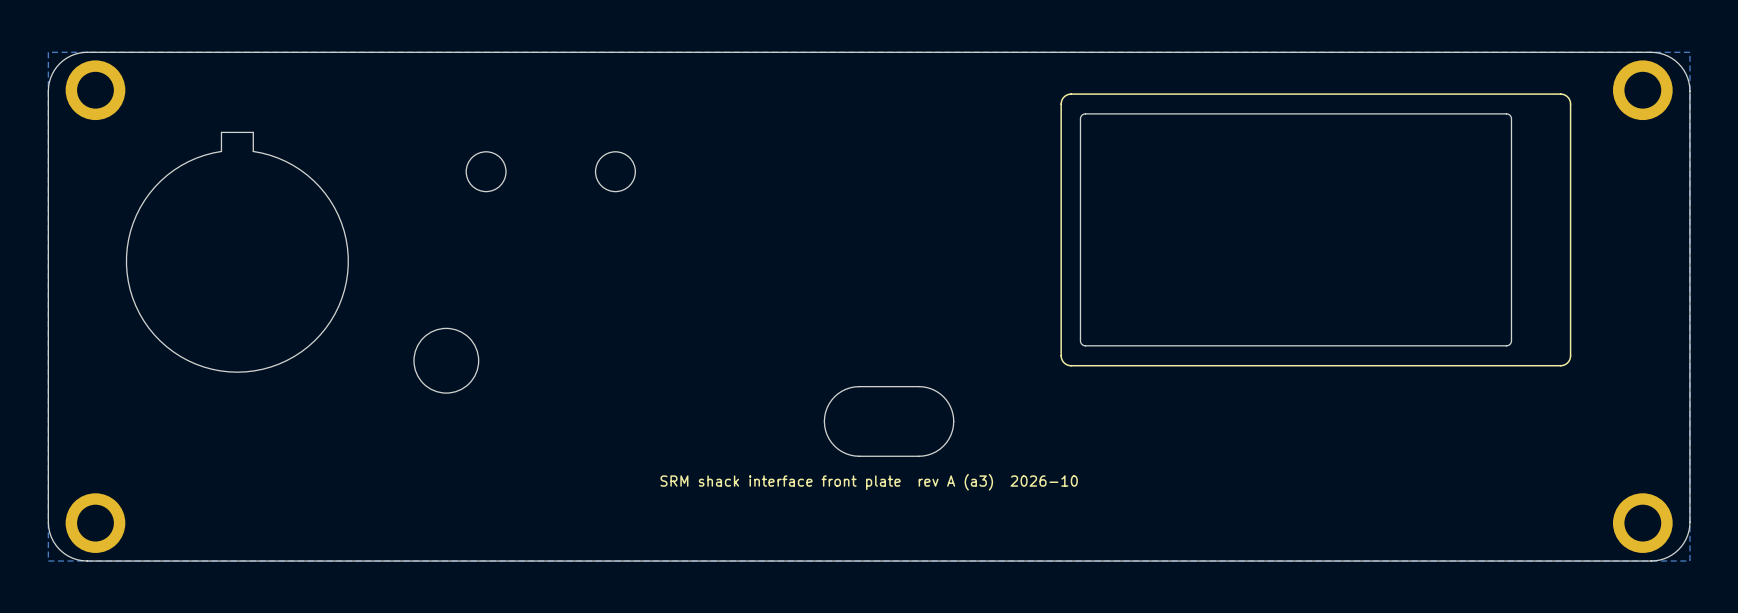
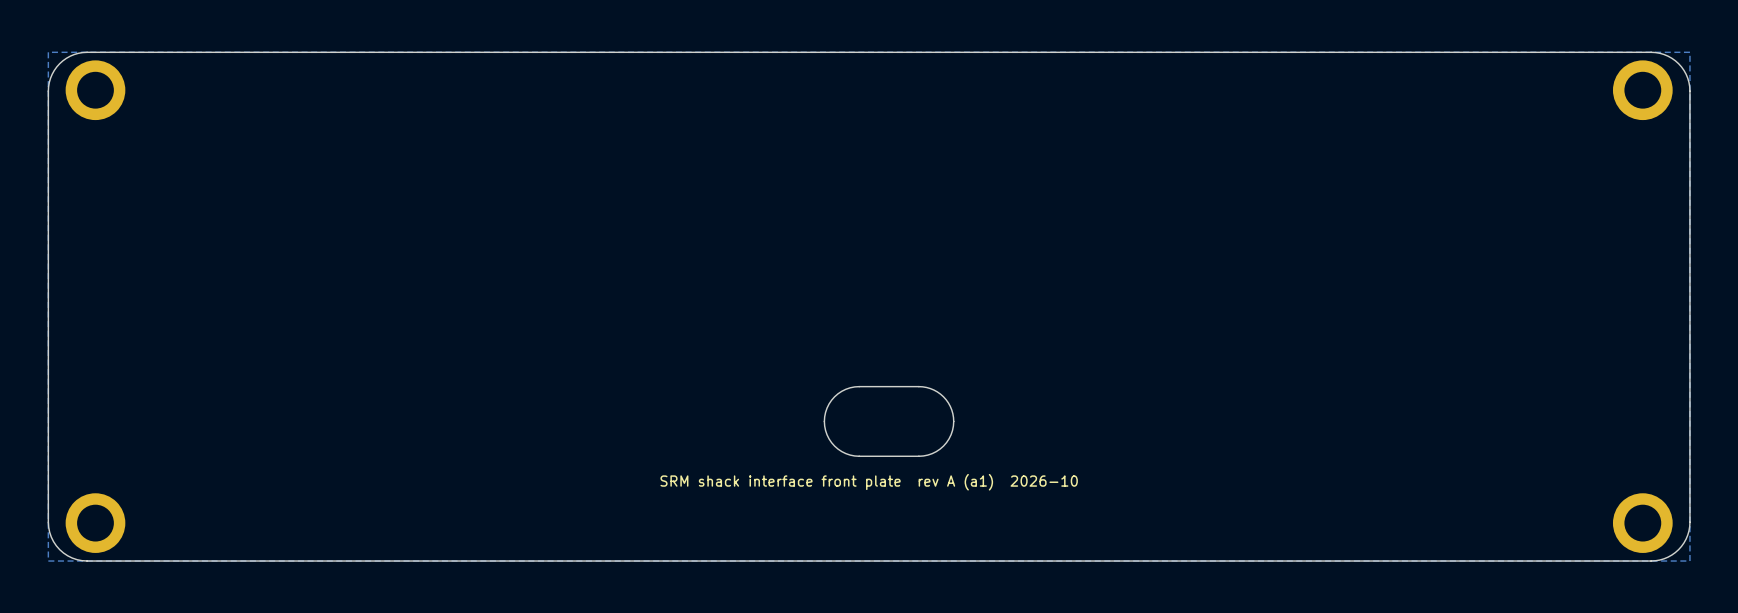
line: (1560, 94) (1066, 95) (1061, 104) (1062, 360) (1071, 365) (1565, 364) (1570, 355) (1570, 104) (1567, 97) (1560, 94) -> none
board edge: (1506, 113) (1083, 114) (1080, 118) (1080, 343) (1085, 345) (1508, 345) (1511, 340) (1511, 118) (1506, 113) -> none
board edge: (253, 132) (221, 132) (221, 151) (188, 161) (161, 180) (149, 193) (136, 215) (127, 247) (126, 264) (130, 290) (139, 313) (148, 328) (160, 340) (180, 356) (203, 366) (220, 370) (245, 371) (270, 366) (286, 360) (308, 346) (325, 328) (335, 313) (344, 290) (347, 273) (346, 239) (341, 223) (330, 200) (313, 180) (293, 165) (269, 155) (253, 151) (253, 132) -> none
round board edge: [465, 151, 507, 193] -> none
round board edge: [595, 151, 636, 193] -> none
round board edge: [413, 327, 480, 394] -> none
text: SRM shack interface front plate rev A (a3) 2026-10 (869, 482) -> SRM shack interface front plate rev A (a1) 2026-10 (869, 482)

